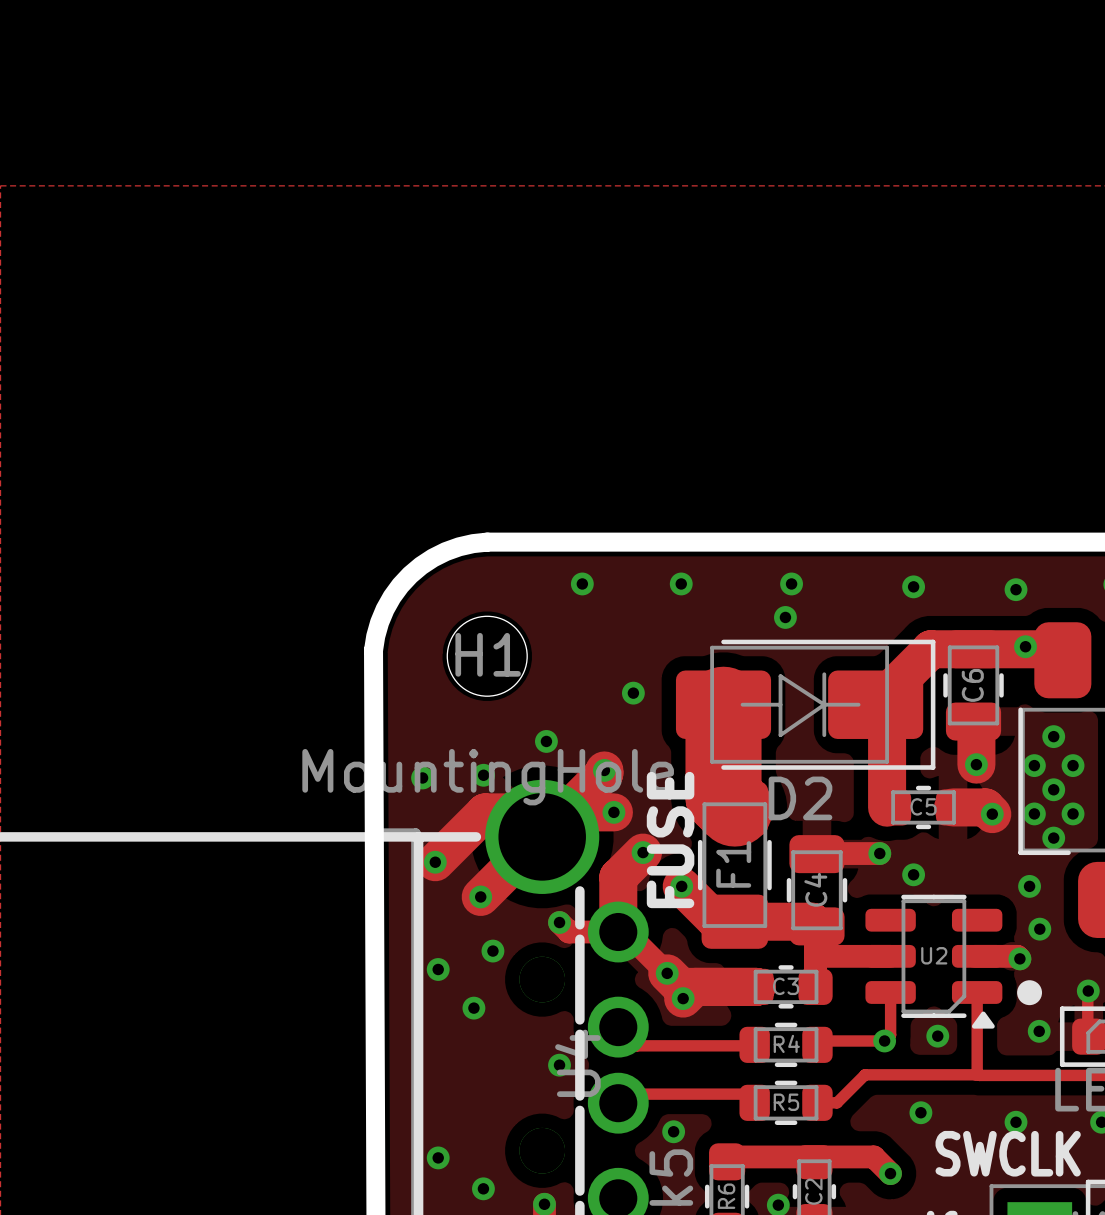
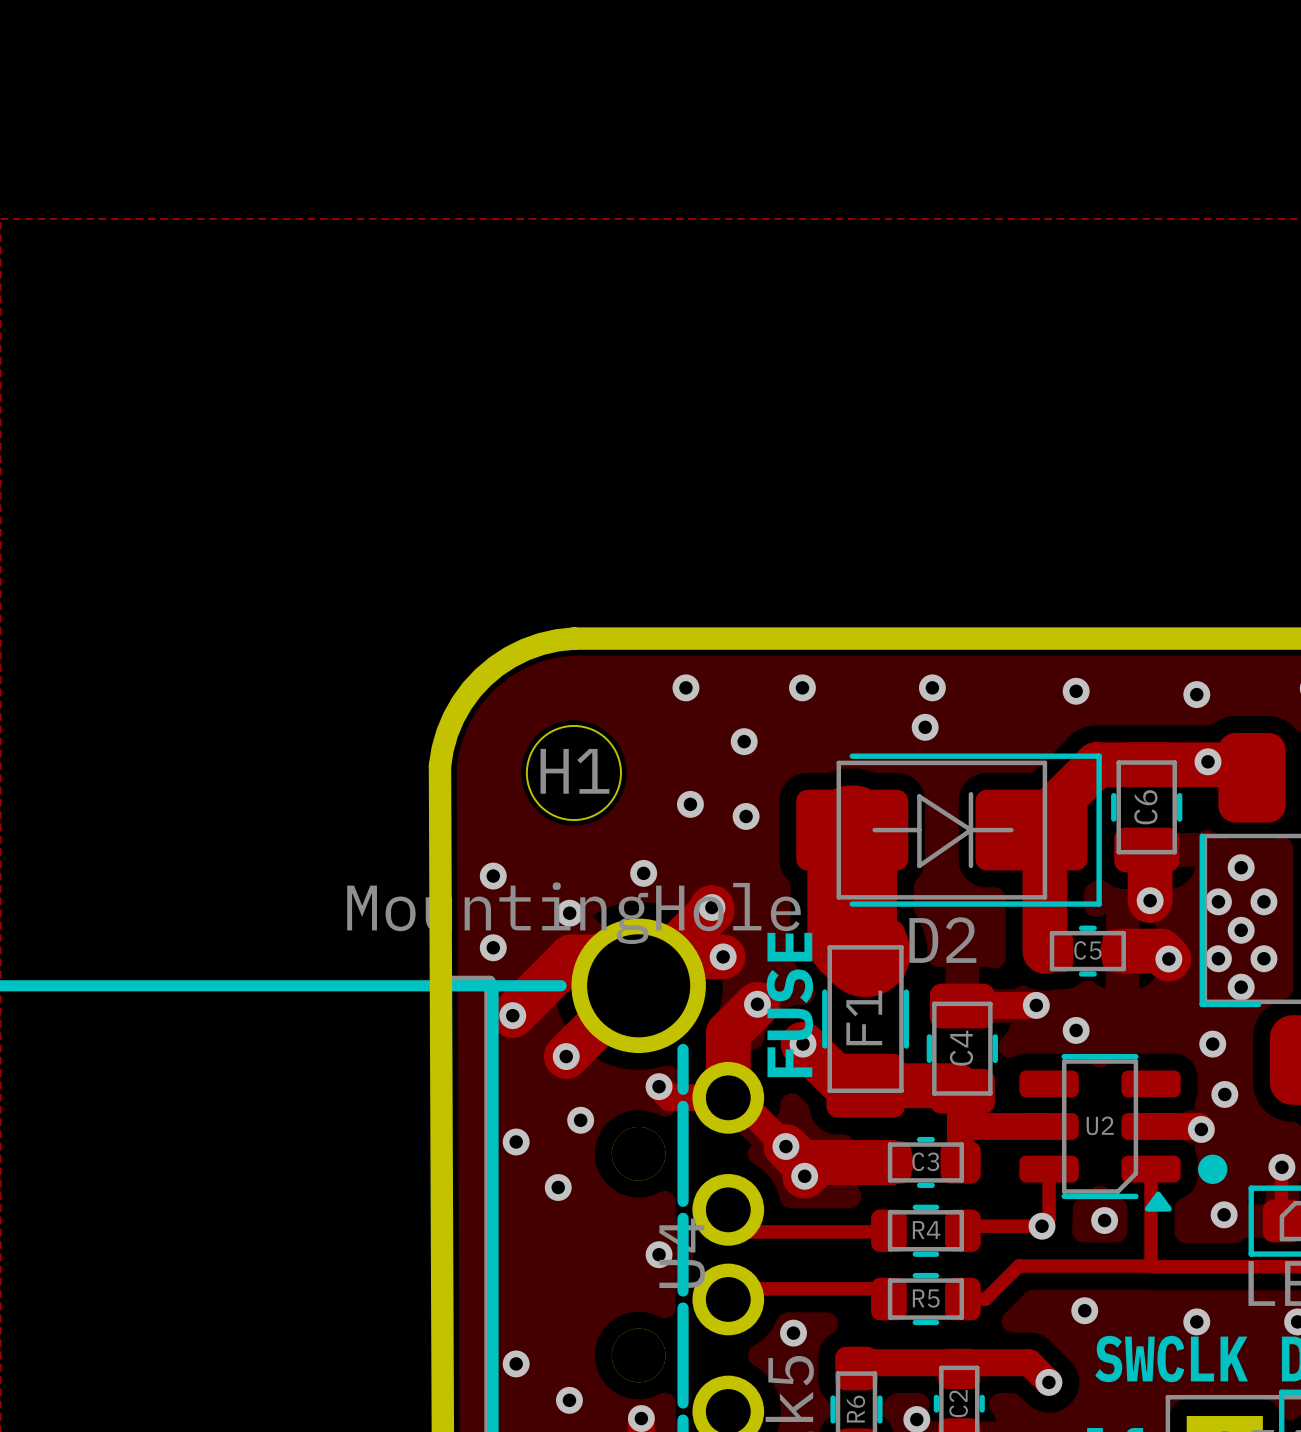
via: none -> (744, 741)
via: none -> (690, 804)
via: none -> (493, 876)
via: (422, 777) -> none
via: none -> (493, 947)

